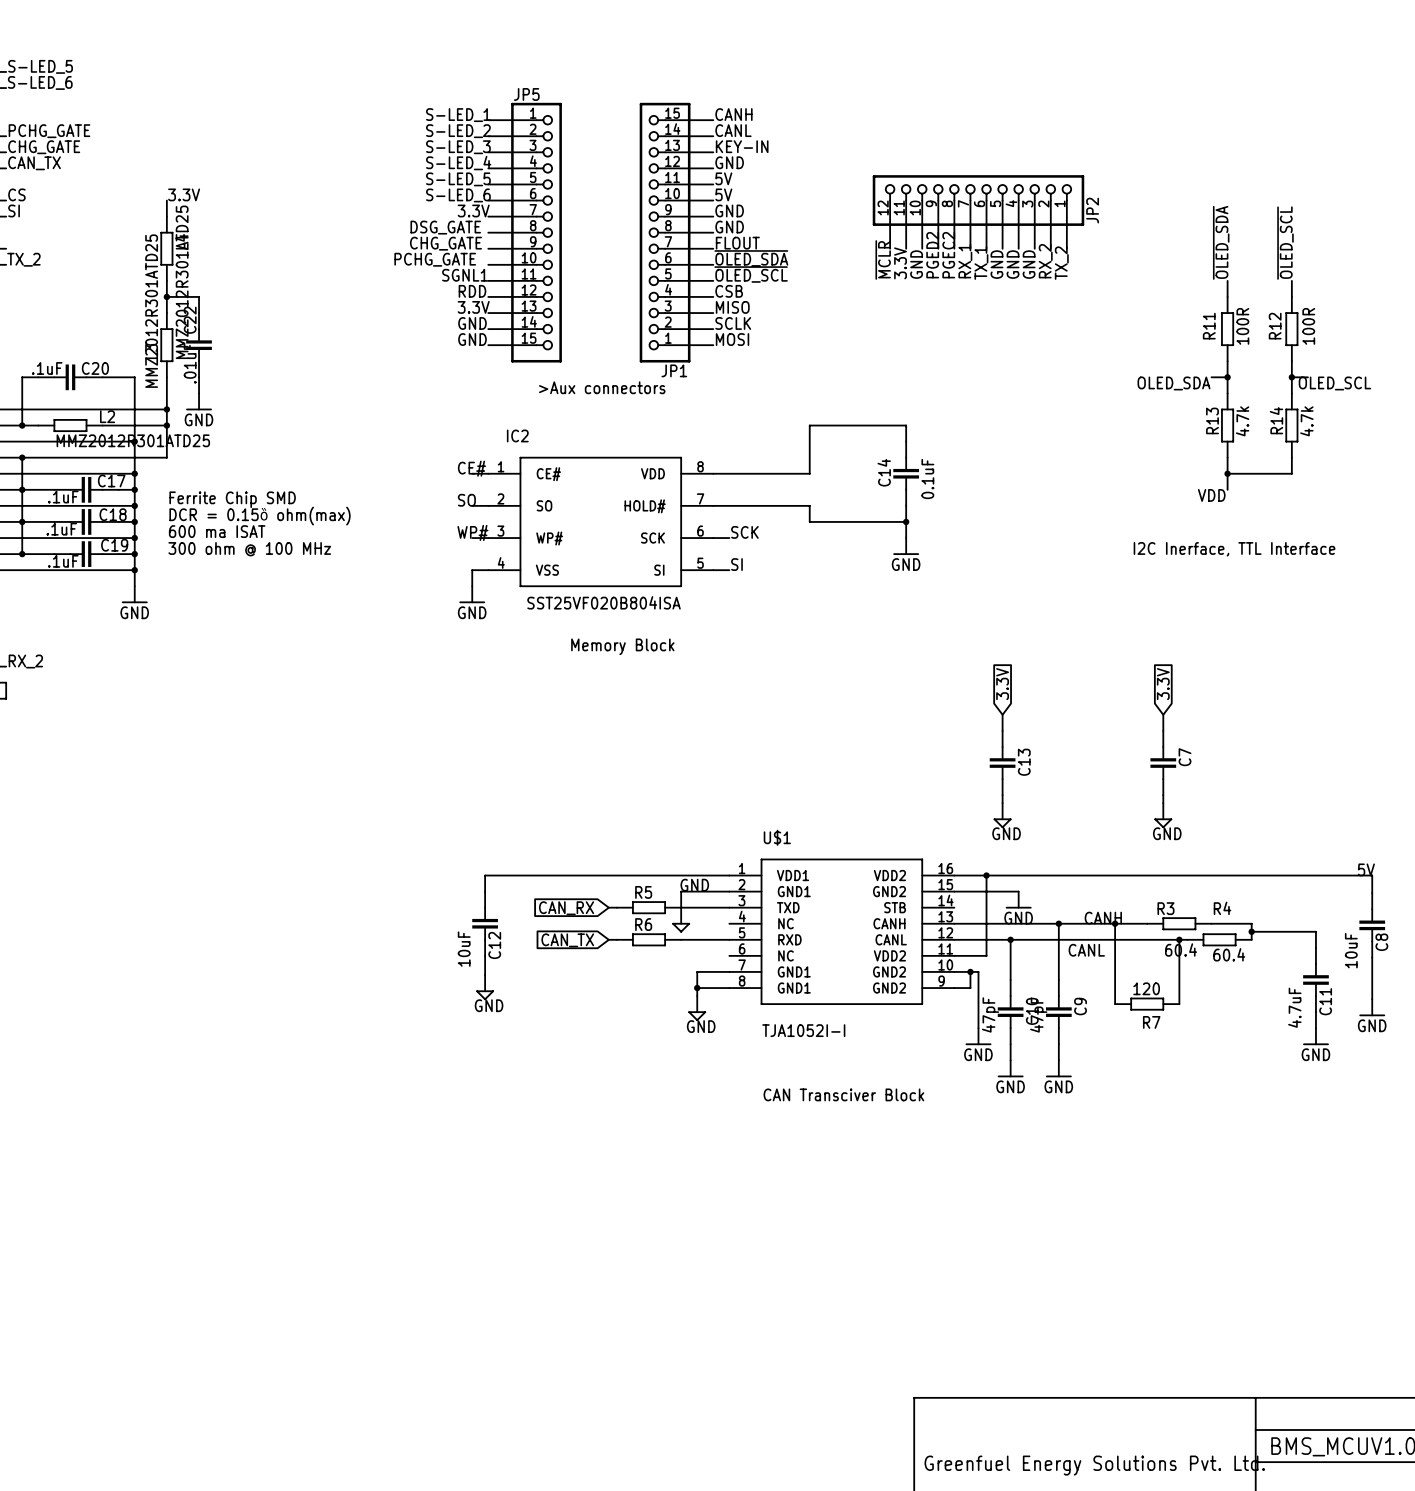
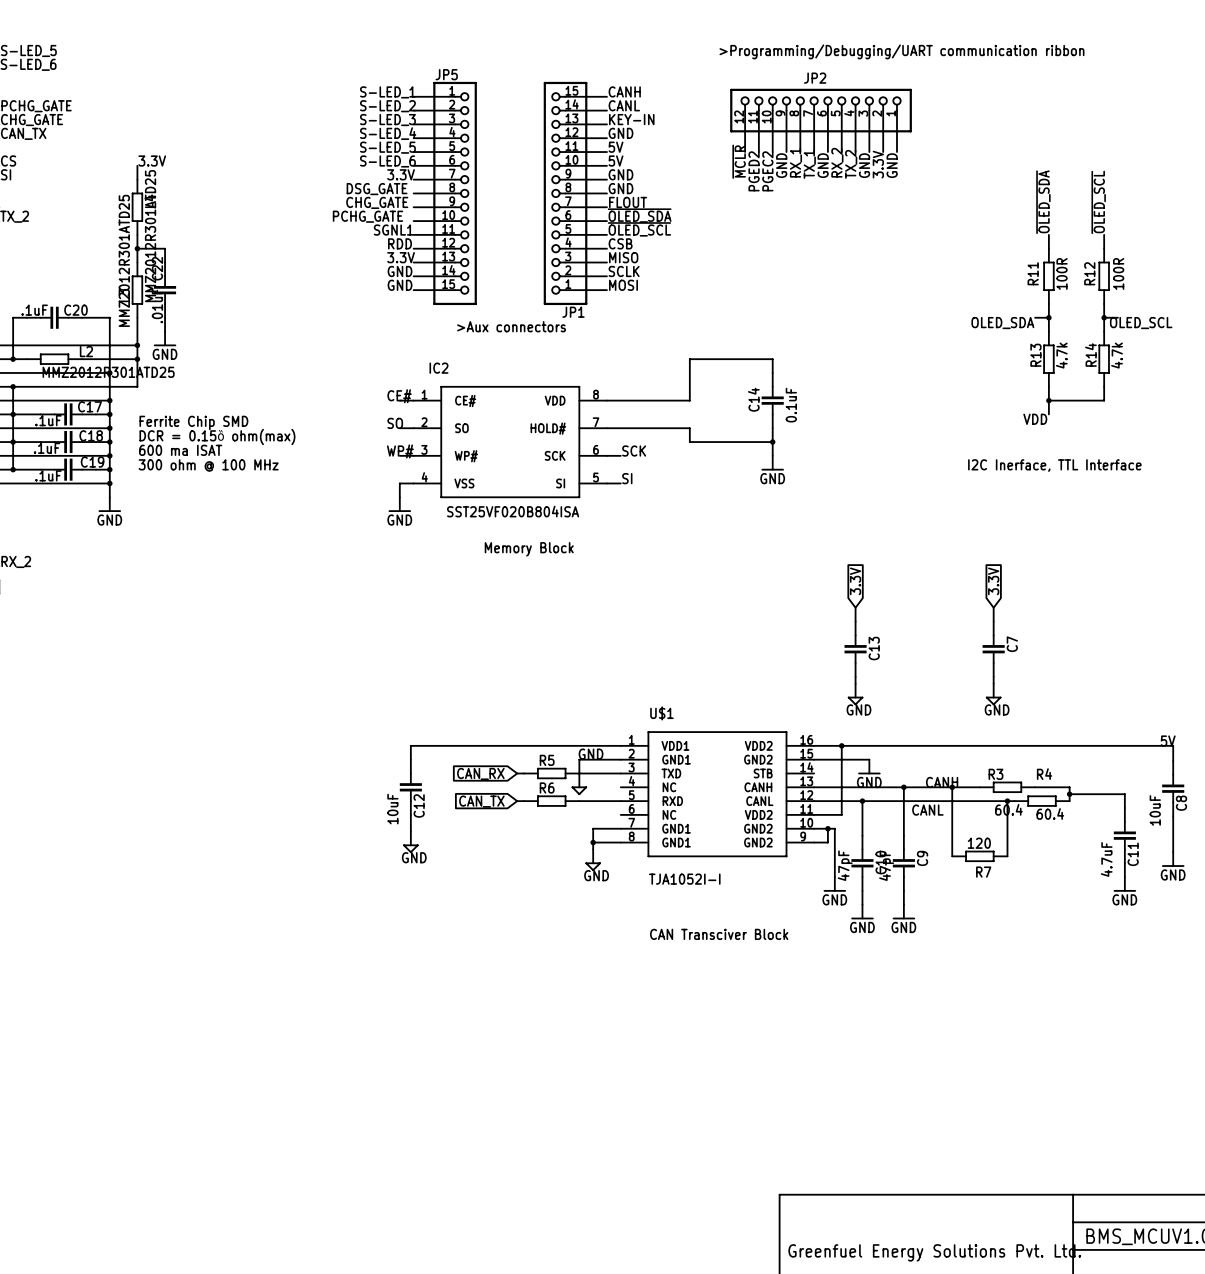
text: none -> >Programming/Debugging/UART communication ribbon (901, 51)
wire: (890, 200) (890, 248) -> (745, 110) (745, 152)
wire: (906, 200) (906, 248) -> (758, 110) (758, 152)
label: none -> GND (781, 165)
wire: (922, 200) (922, 248) -> (772, 110) (772, 152)
wire: (938, 200) (938, 248) -> (786, 110) (786, 152)
wire: (954, 200) (954, 248) -> (800, 110) (800, 152)
label: none -> GND (823, 165)
wire: (970, 200) (970, 248) -> (814, 110) (814, 152)
JP2 position: (978, 200) -> (821, 110)
wire: (986, 200) (986, 248) -> (827, 110) (827, 152)
wire: (1002, 200) (1002, 248) -> (841, 110) (841, 152)
label: none -> GND (864, 165)
wire: (1018, 200) (1018, 248) -> (855, 110) (855, 152)
wire: (1034, 200) (1034, 248) -> (869, 110) (869, 152)
label: none -> GND (892, 165)
wire: (1050, 200) (1050, 248) -> (883, 110) (883, 152)
wire: (1066, 200) (1066, 248) -> (896, 110) (896, 152)
JP2 name rotation: 0° (1092, 210) -> 90° clockwise (815, 78)
JP2 name position: JP2 (1092, 210) -> JP2 (815, 78)
label position: PGED2 (932, 255) -> PGED2 (754, 171)
label position: PGEC2 (948, 255) -> PGEC2 (767, 171)
label position: ~{MCLR} (883, 259) -> ~{MCLR} (739, 161)
label position: RX_1 (965, 261) -> RX_1 (795, 162)
label position: RX_2 (1045, 261) -> RX_2 (837, 162)
label position: 3.3V (900, 263) -> 3.3V (878, 164)
label position: TX_1 (981, 263) -> TX_1 (809, 164)
label position: TX_2 (1061, 263) -> TX_2 (851, 164)
label: GND (916, 264) -> none
label: GND (996, 264) -> none
label: GND (1013, 264) -> none
label: GND (1029, 264) -> none

